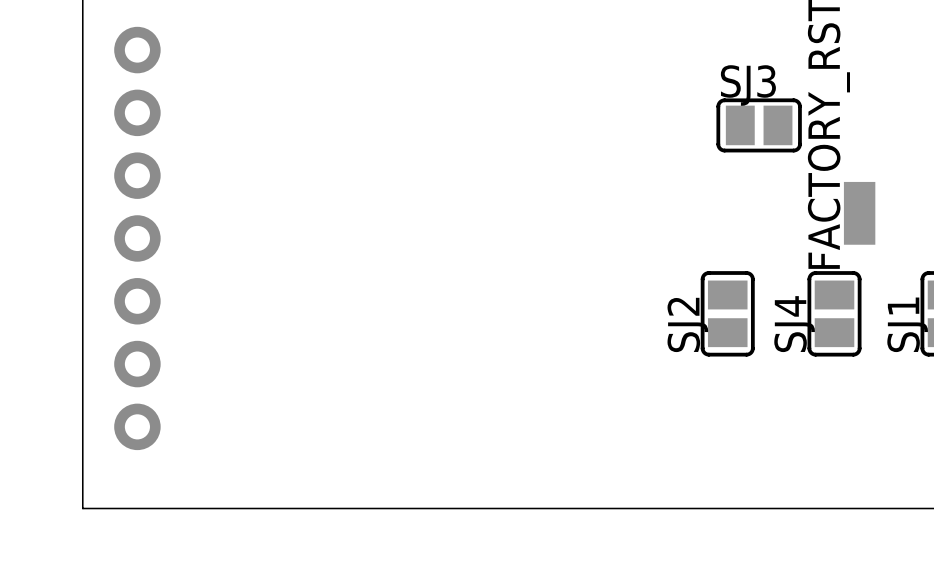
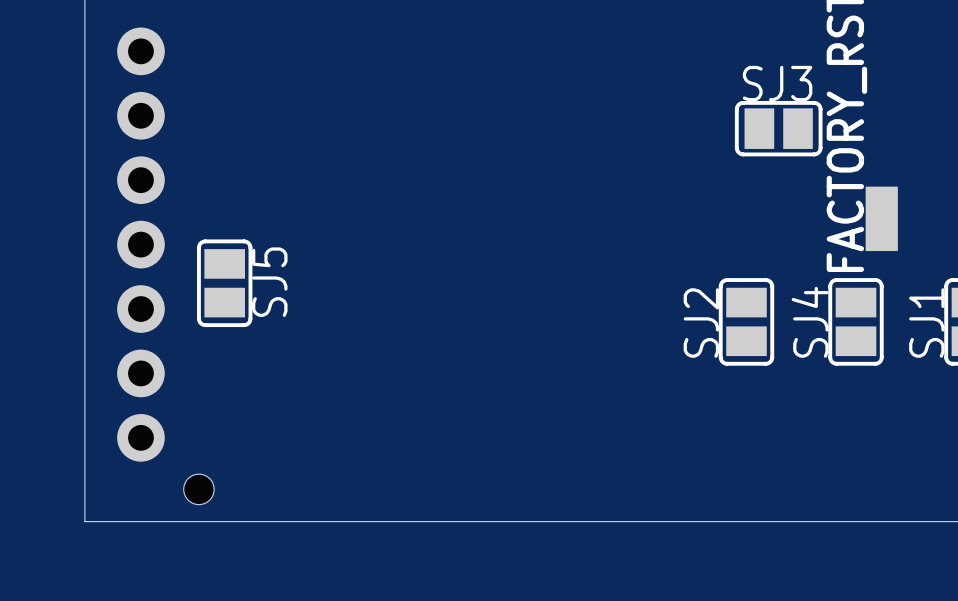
SJ5: none -> (224, 283)
hole: none -> (198, 489)

